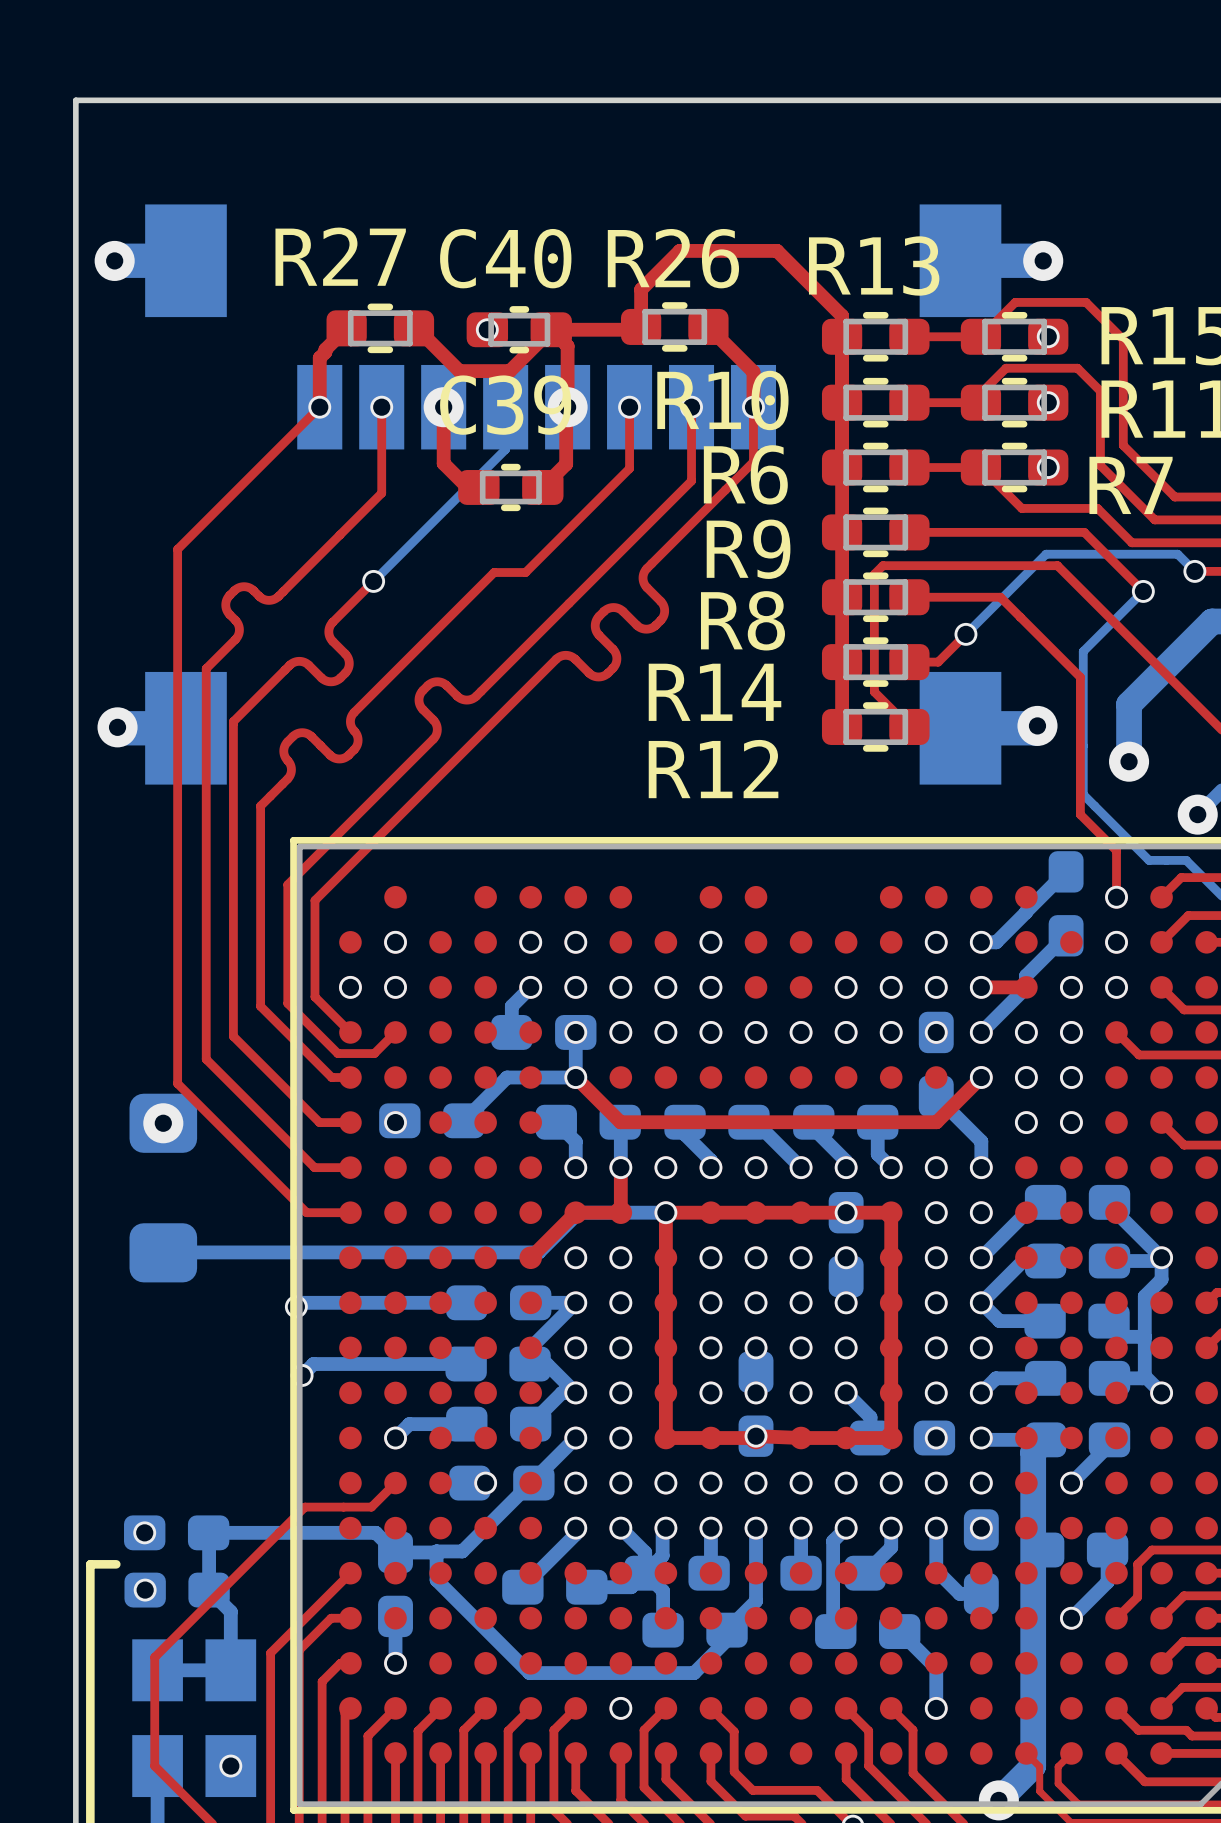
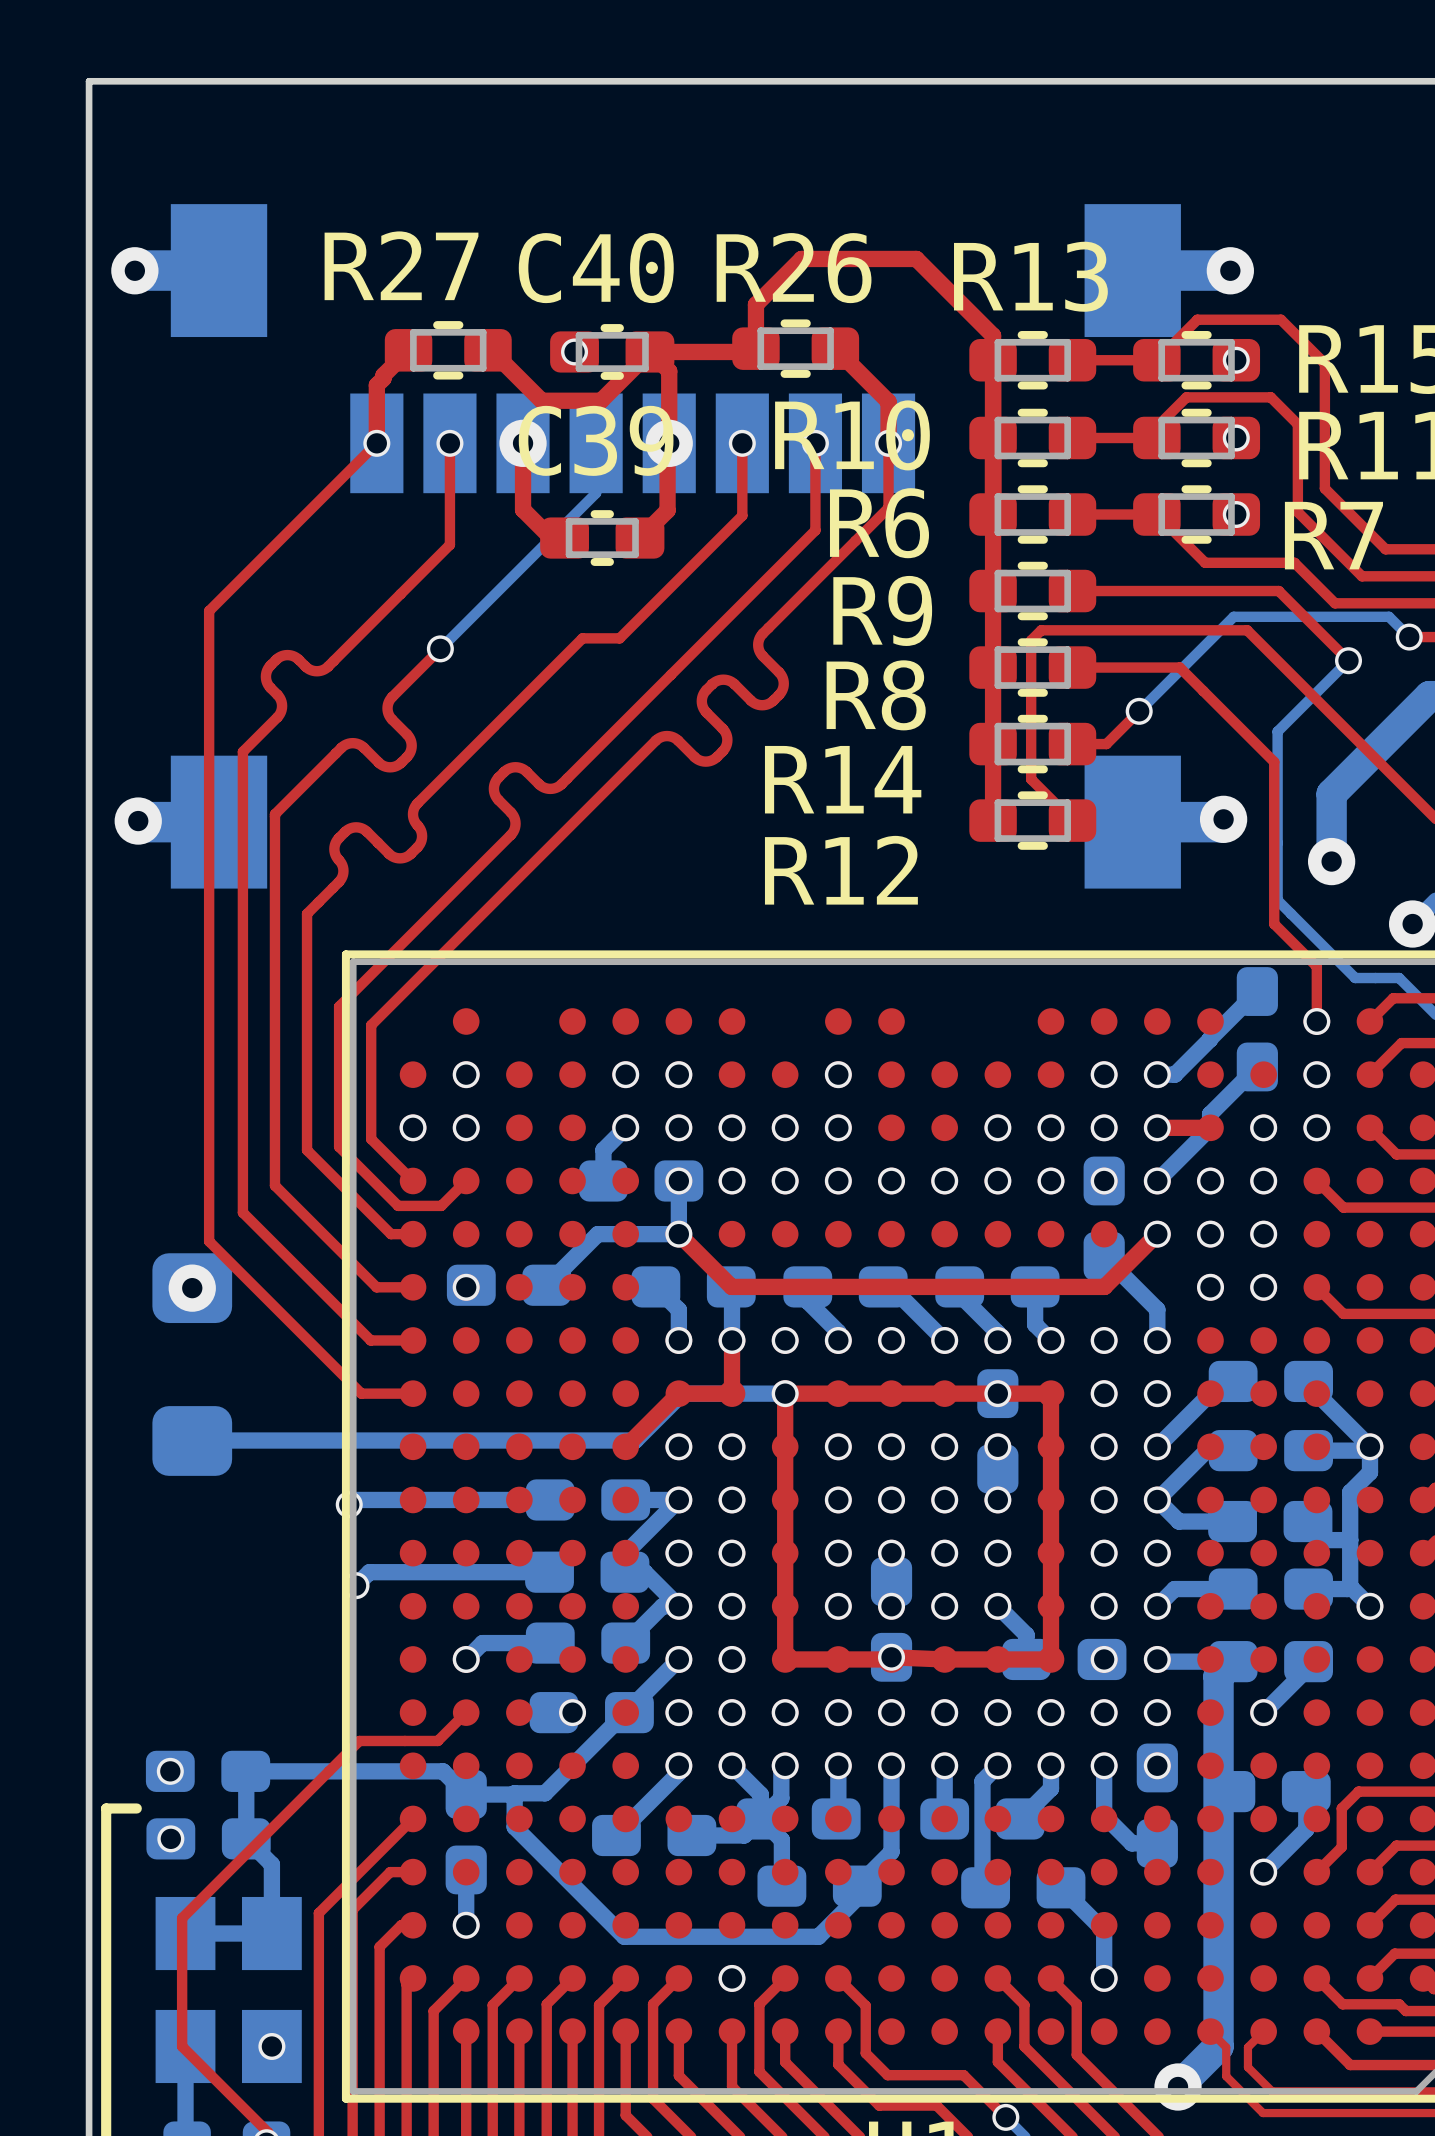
top track: (1161, 1122) (1184, 1145) -> (1316, 1287) (1343, 1313) (1396, 1313)

